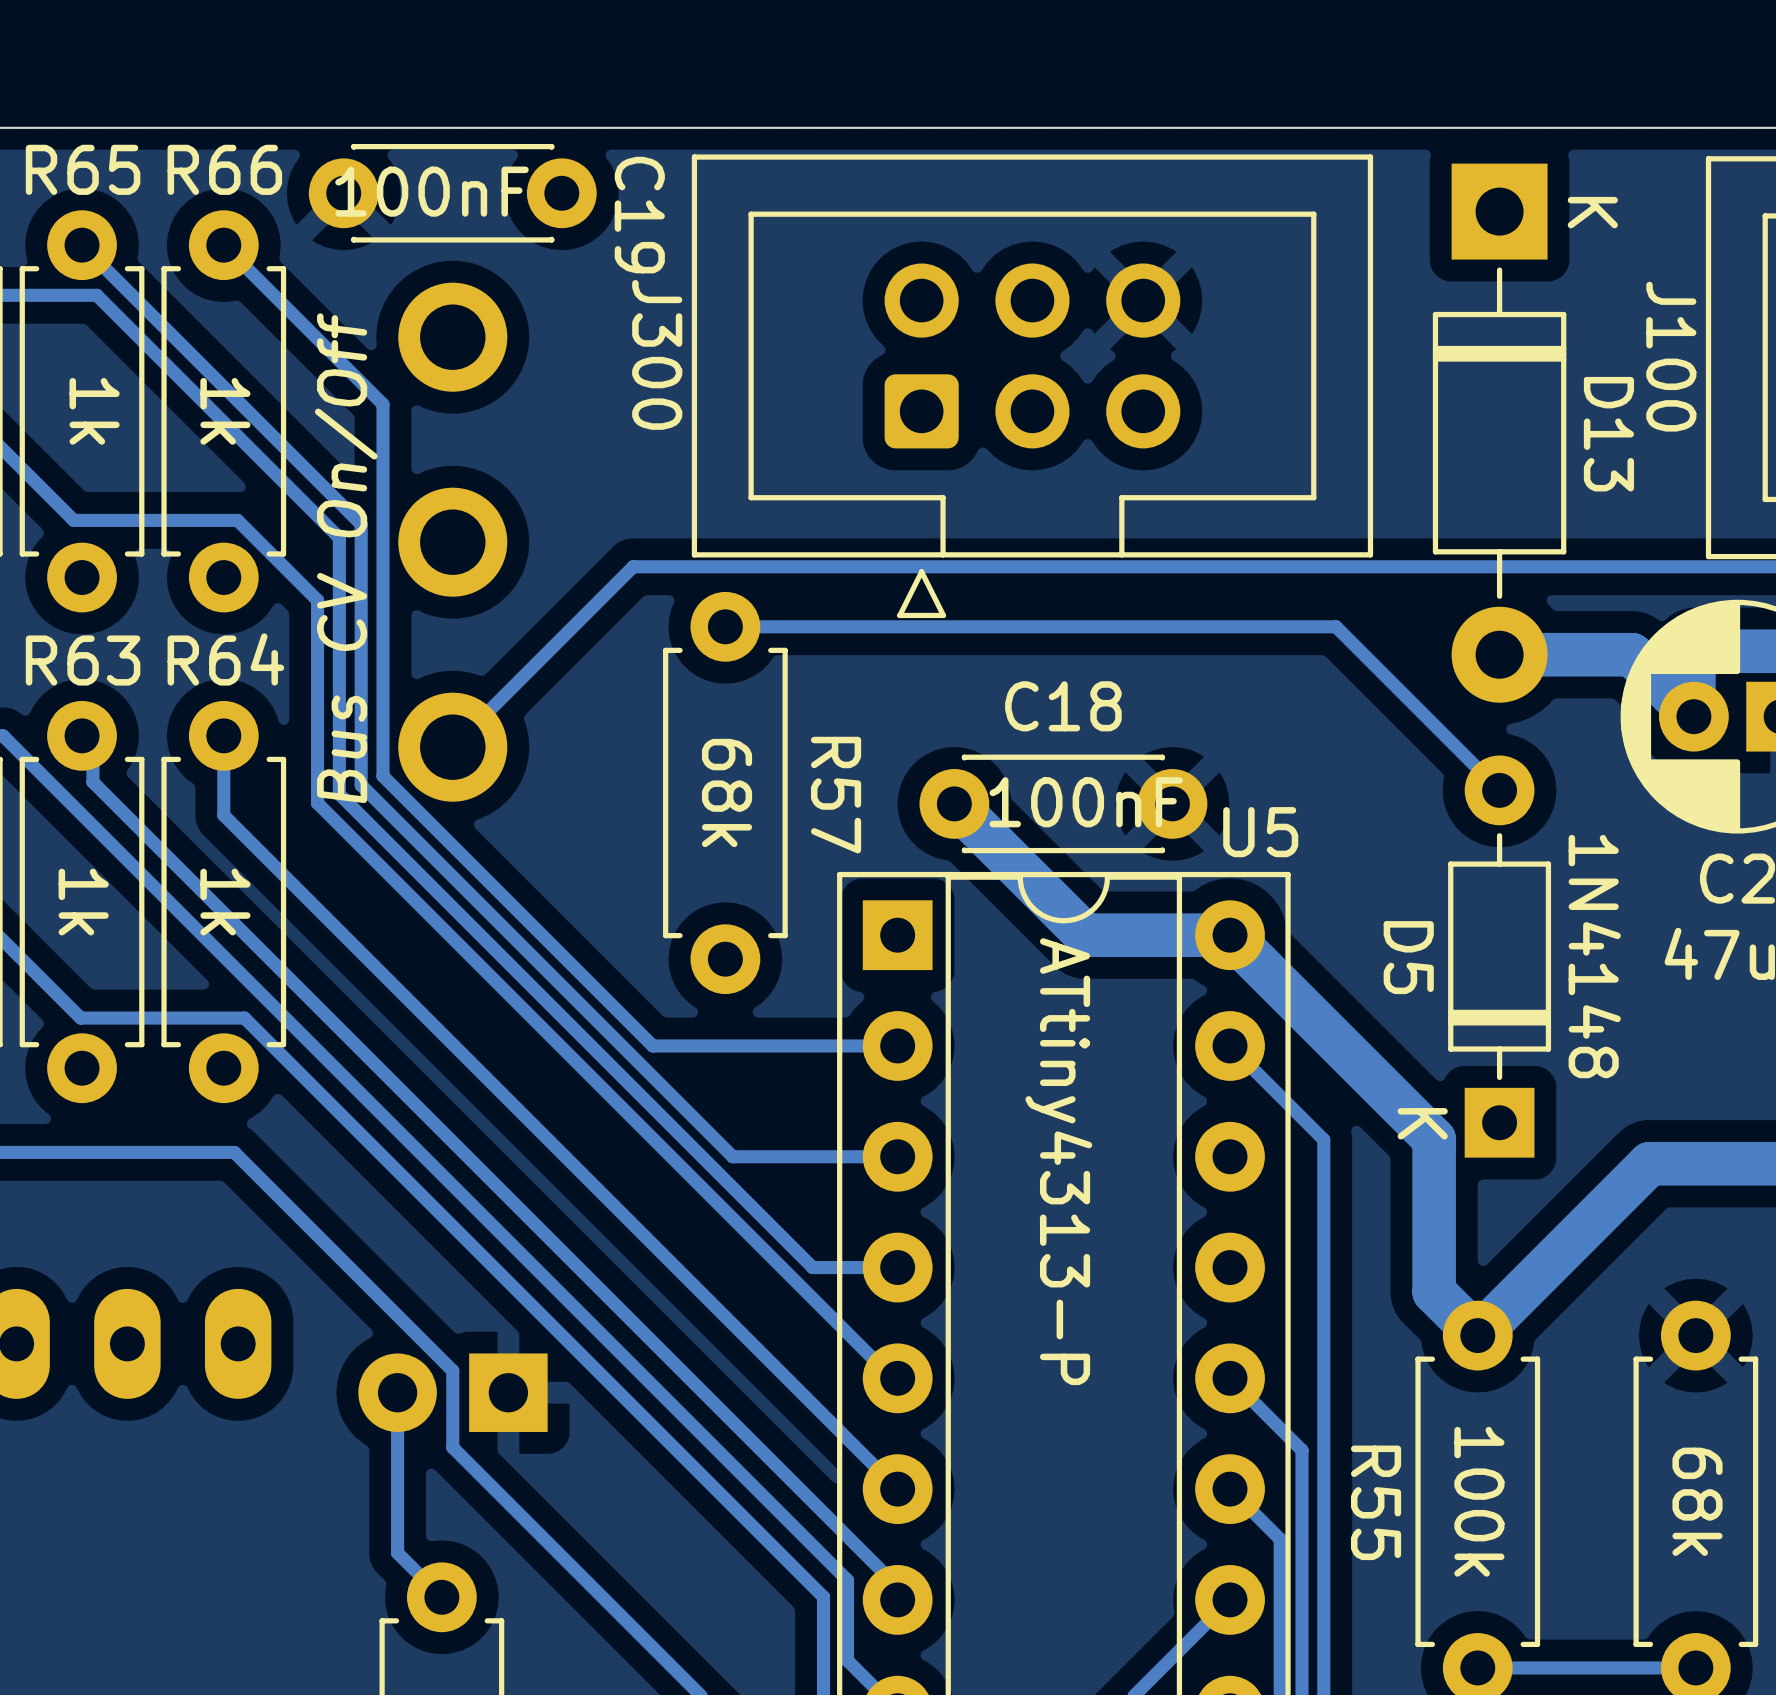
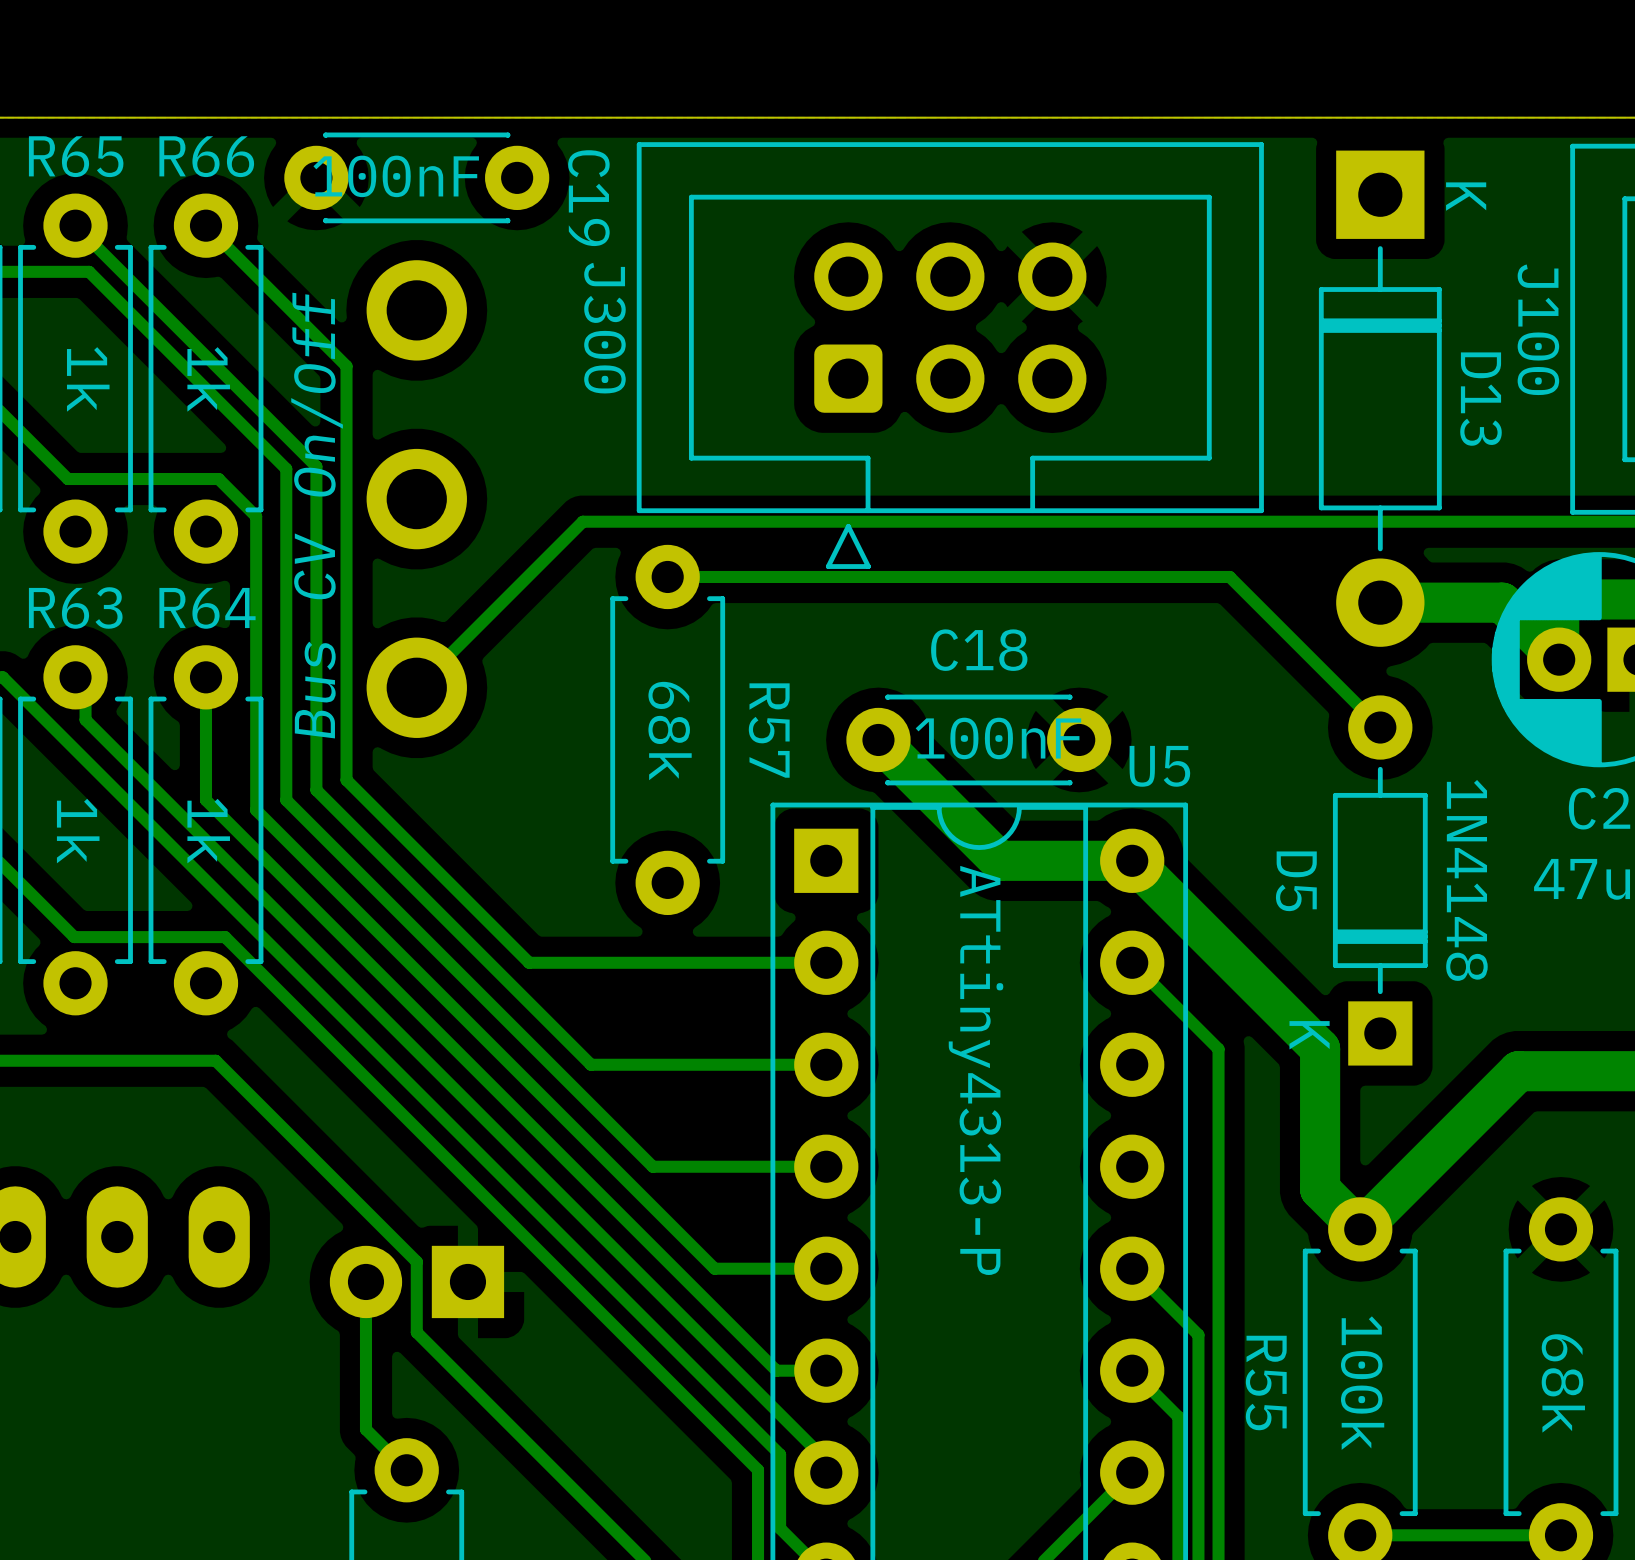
track: (376, 397) (382, 404) (382, 776) (652, 1045) -> (346, 366) (346, 780) (529, 962) (600, 962)
track: (343, 506) (361, 524) (361, 785) (732, 1156) -> (316, 466) (316, 790) (591, 1064) (674, 1064)
track: (311, 509) (339, 537) (339, 794) (812, 1267) -> (286, 468) (286, 800) (652, 1166) (748, 1166)
track: (278, 561) (317, 600) (317, 803) (892, 1378) -> (256, 516) (256, 810) (714, 1268) (821, 1268)
track: (223, 815) (897, 1489) -> (205, 750) (205, 800) (776, 1370) (826, 1370)

